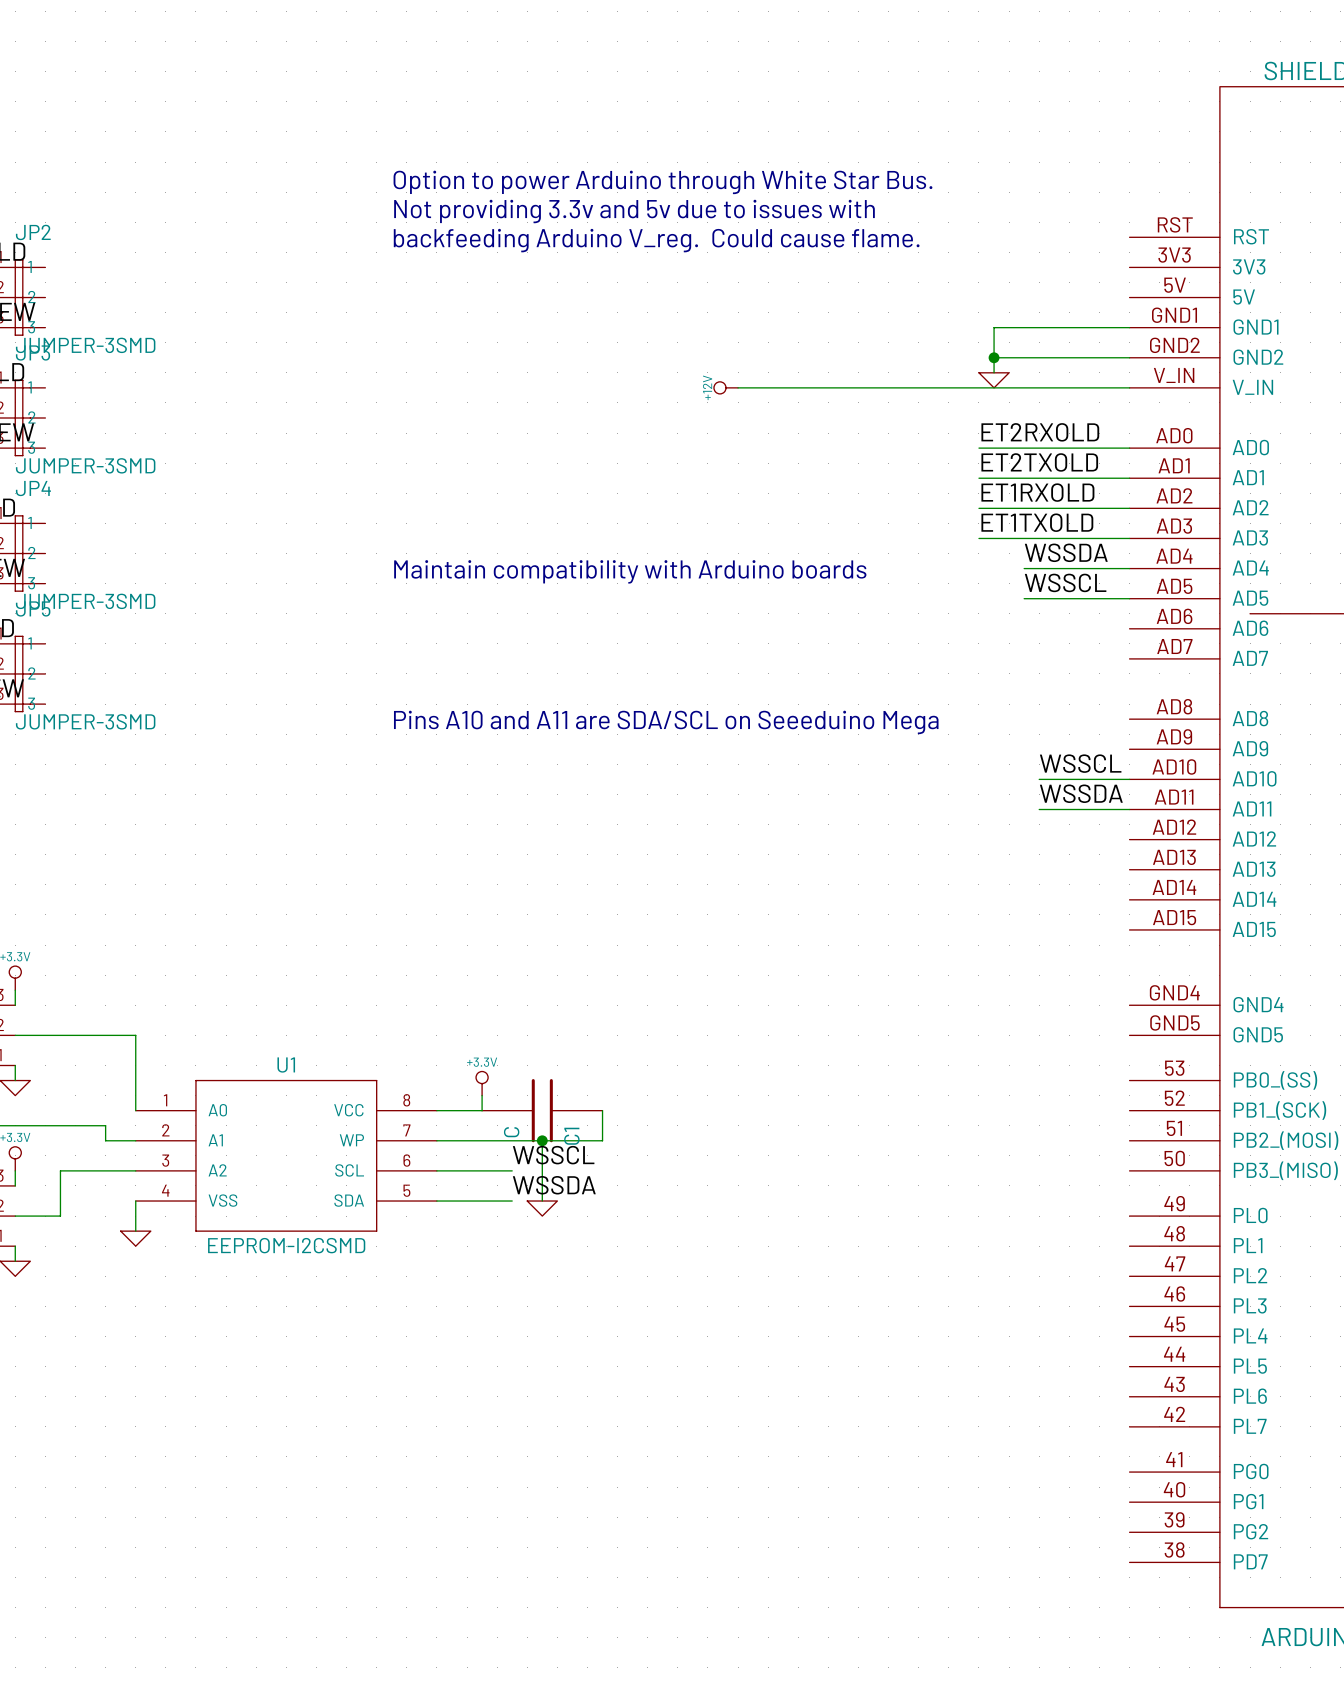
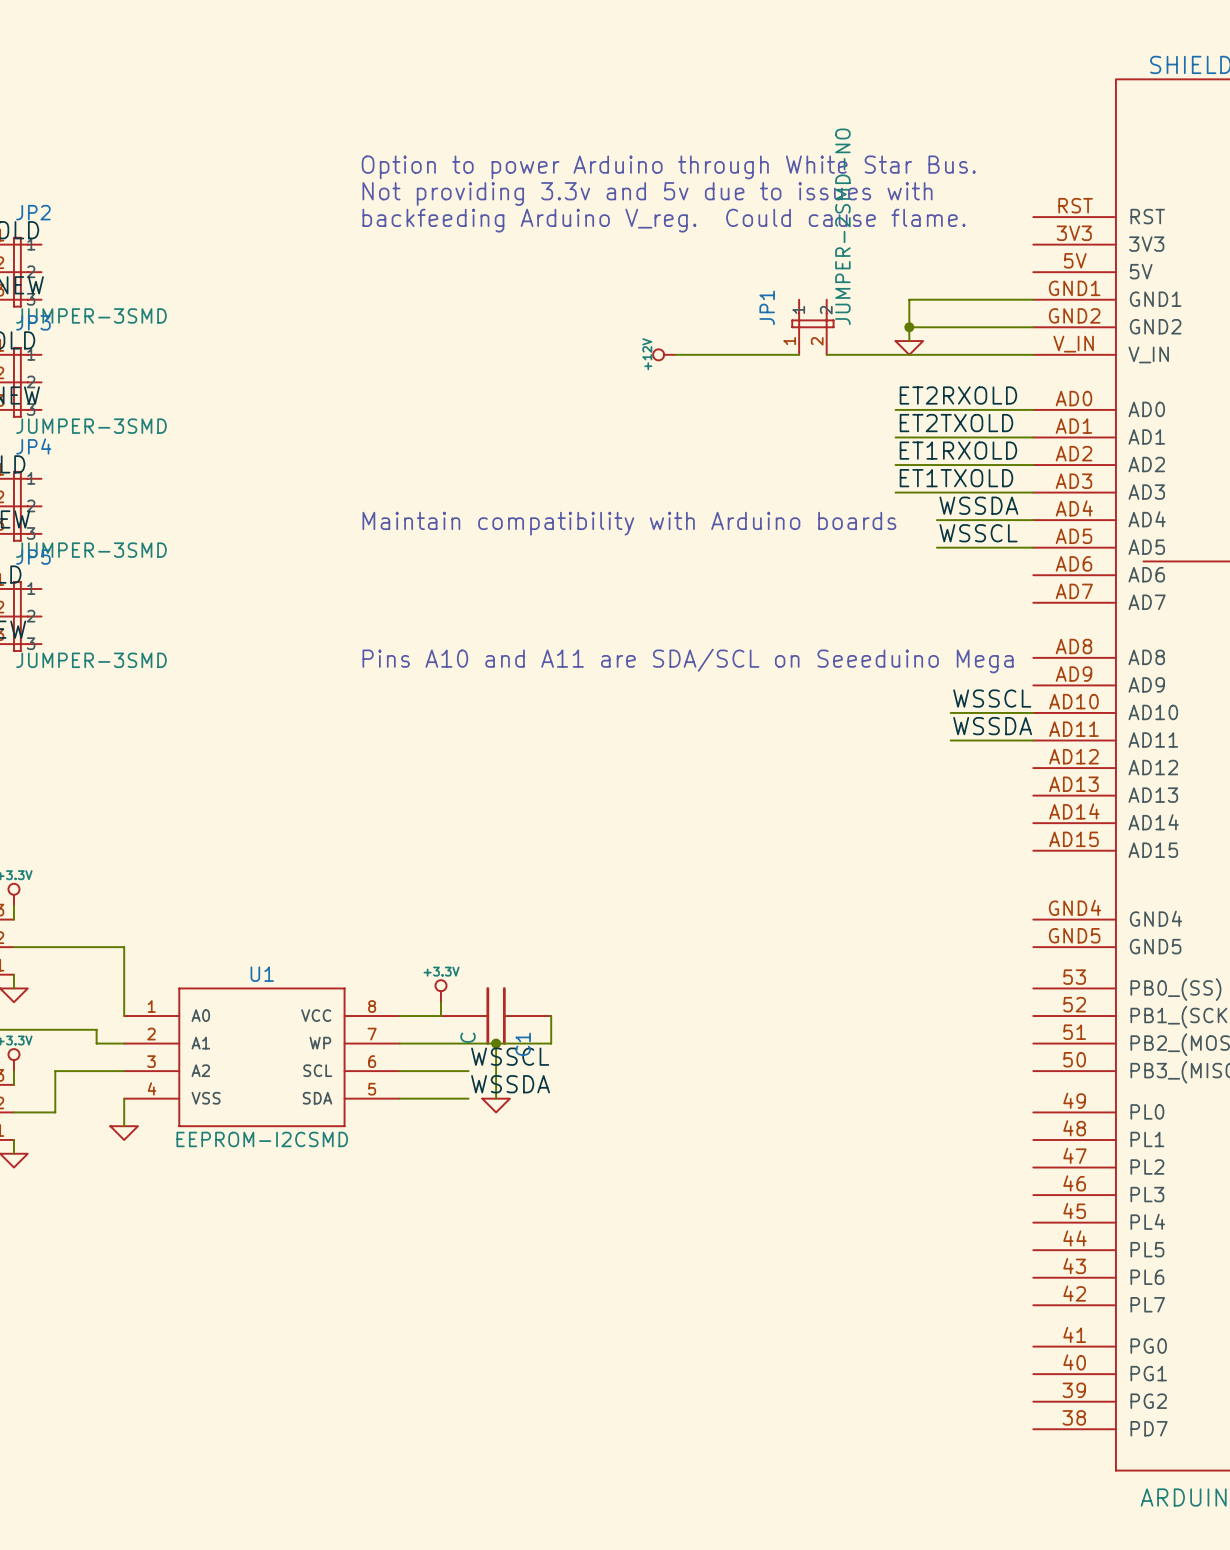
JP1: none -> JUMPER-2SMD-NO (812, 327)
wire: (873, 387) (903, 387) -> none

